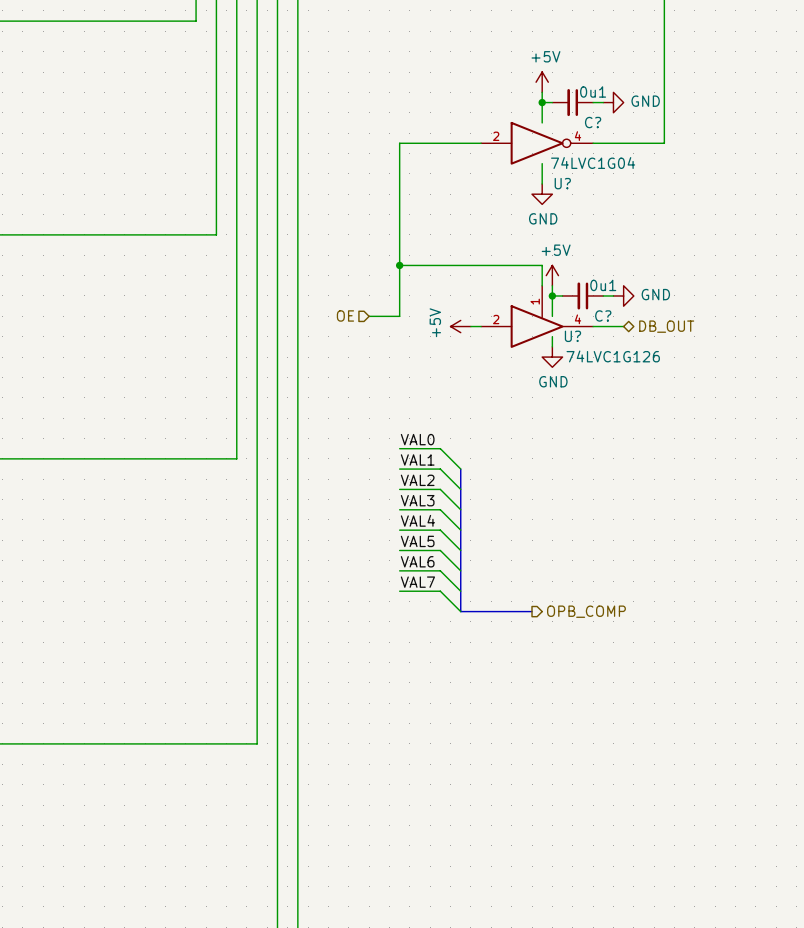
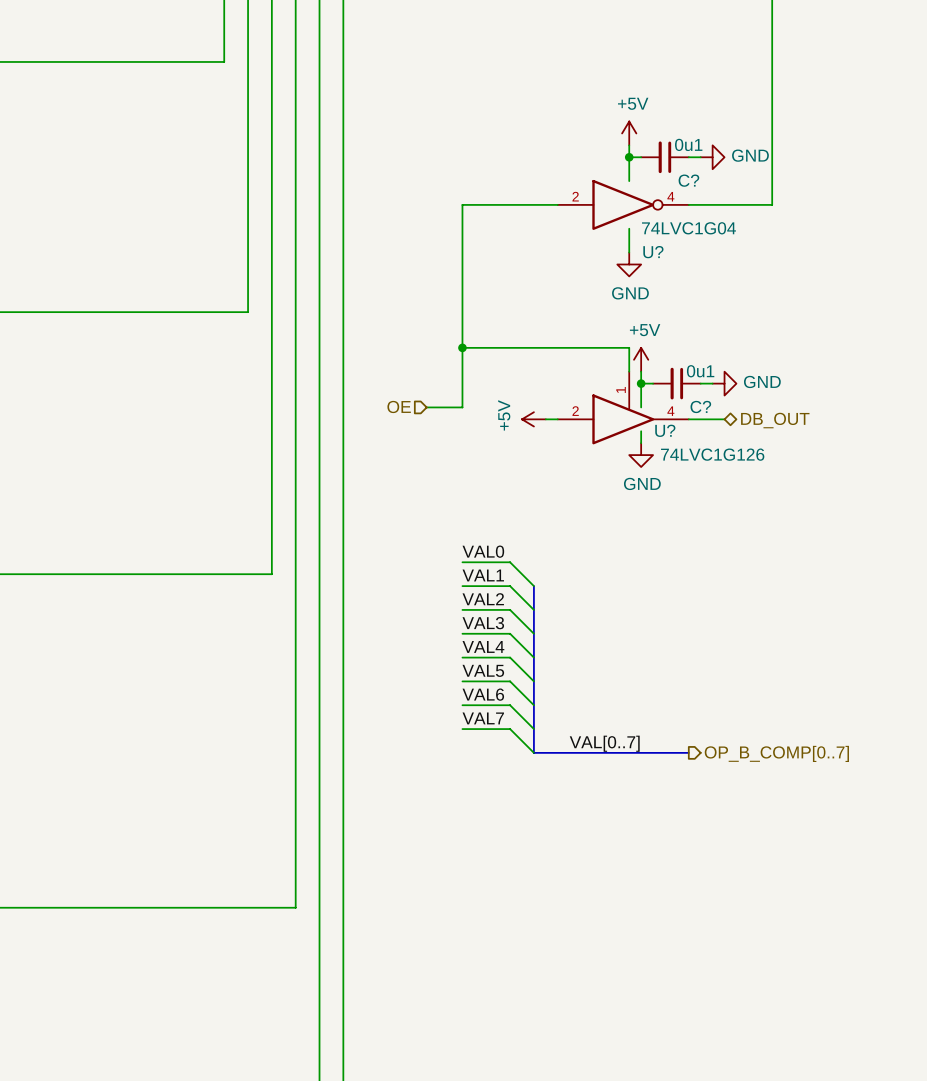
label: none -> VAL[0..7] (604, 743)
bus: none -> (617, 752) (688, 752)
hierarchical label: OPB_COMP (586, 611) -> OP_B_COMP[0..7] (776, 753)

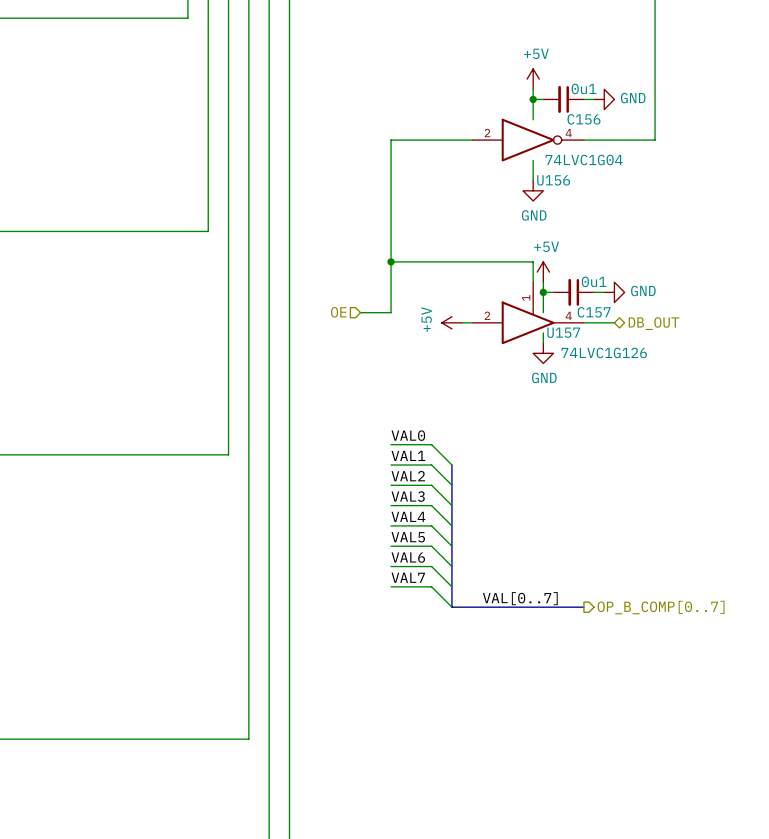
C? name: C? (688, 180) -> C156 (584, 119)
U? name: U? (653, 252) -> U156 (553, 180)
C? name: C? (700, 406) -> C157 (594, 312)
U? name: U? (665, 430) -> U157 (563, 332)

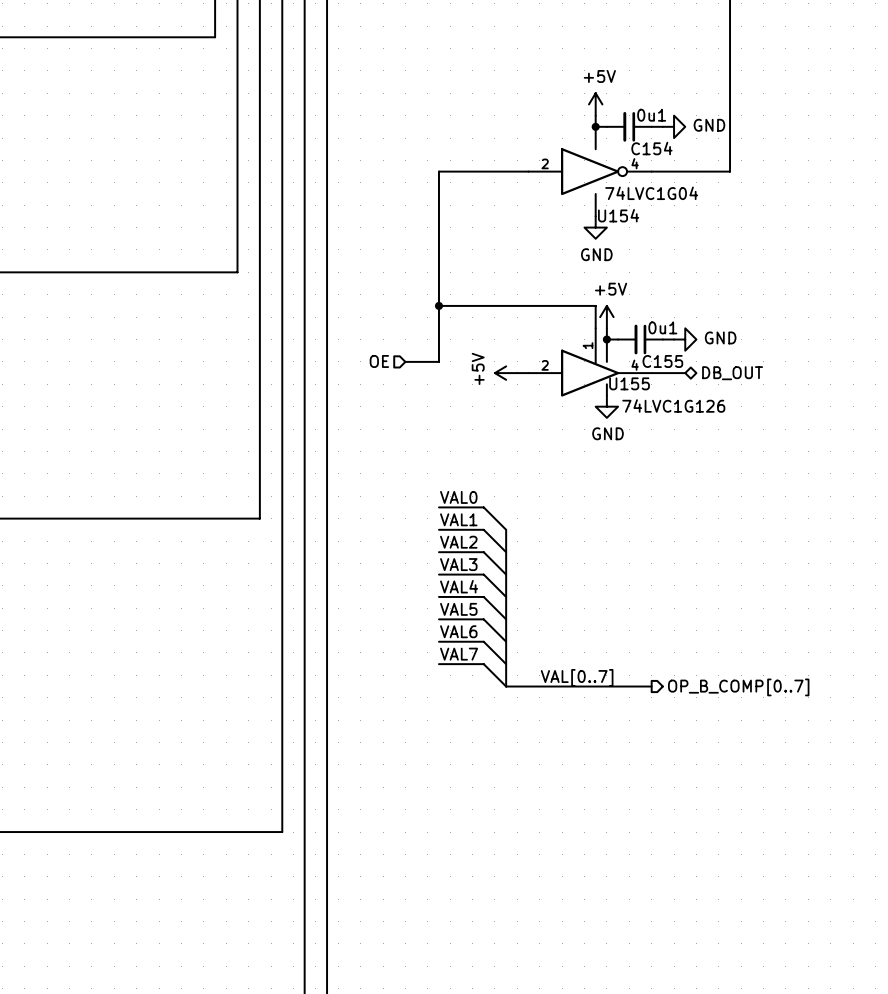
C156 name: C156 (584, 119) -> C154 (651, 148)
U156 name: U156 (553, 180) -> U154 (618, 215)
C157 name: C157 (594, 312) -> C155 (662, 361)
U157 name: U157 (563, 332) -> U155 (629, 383)

